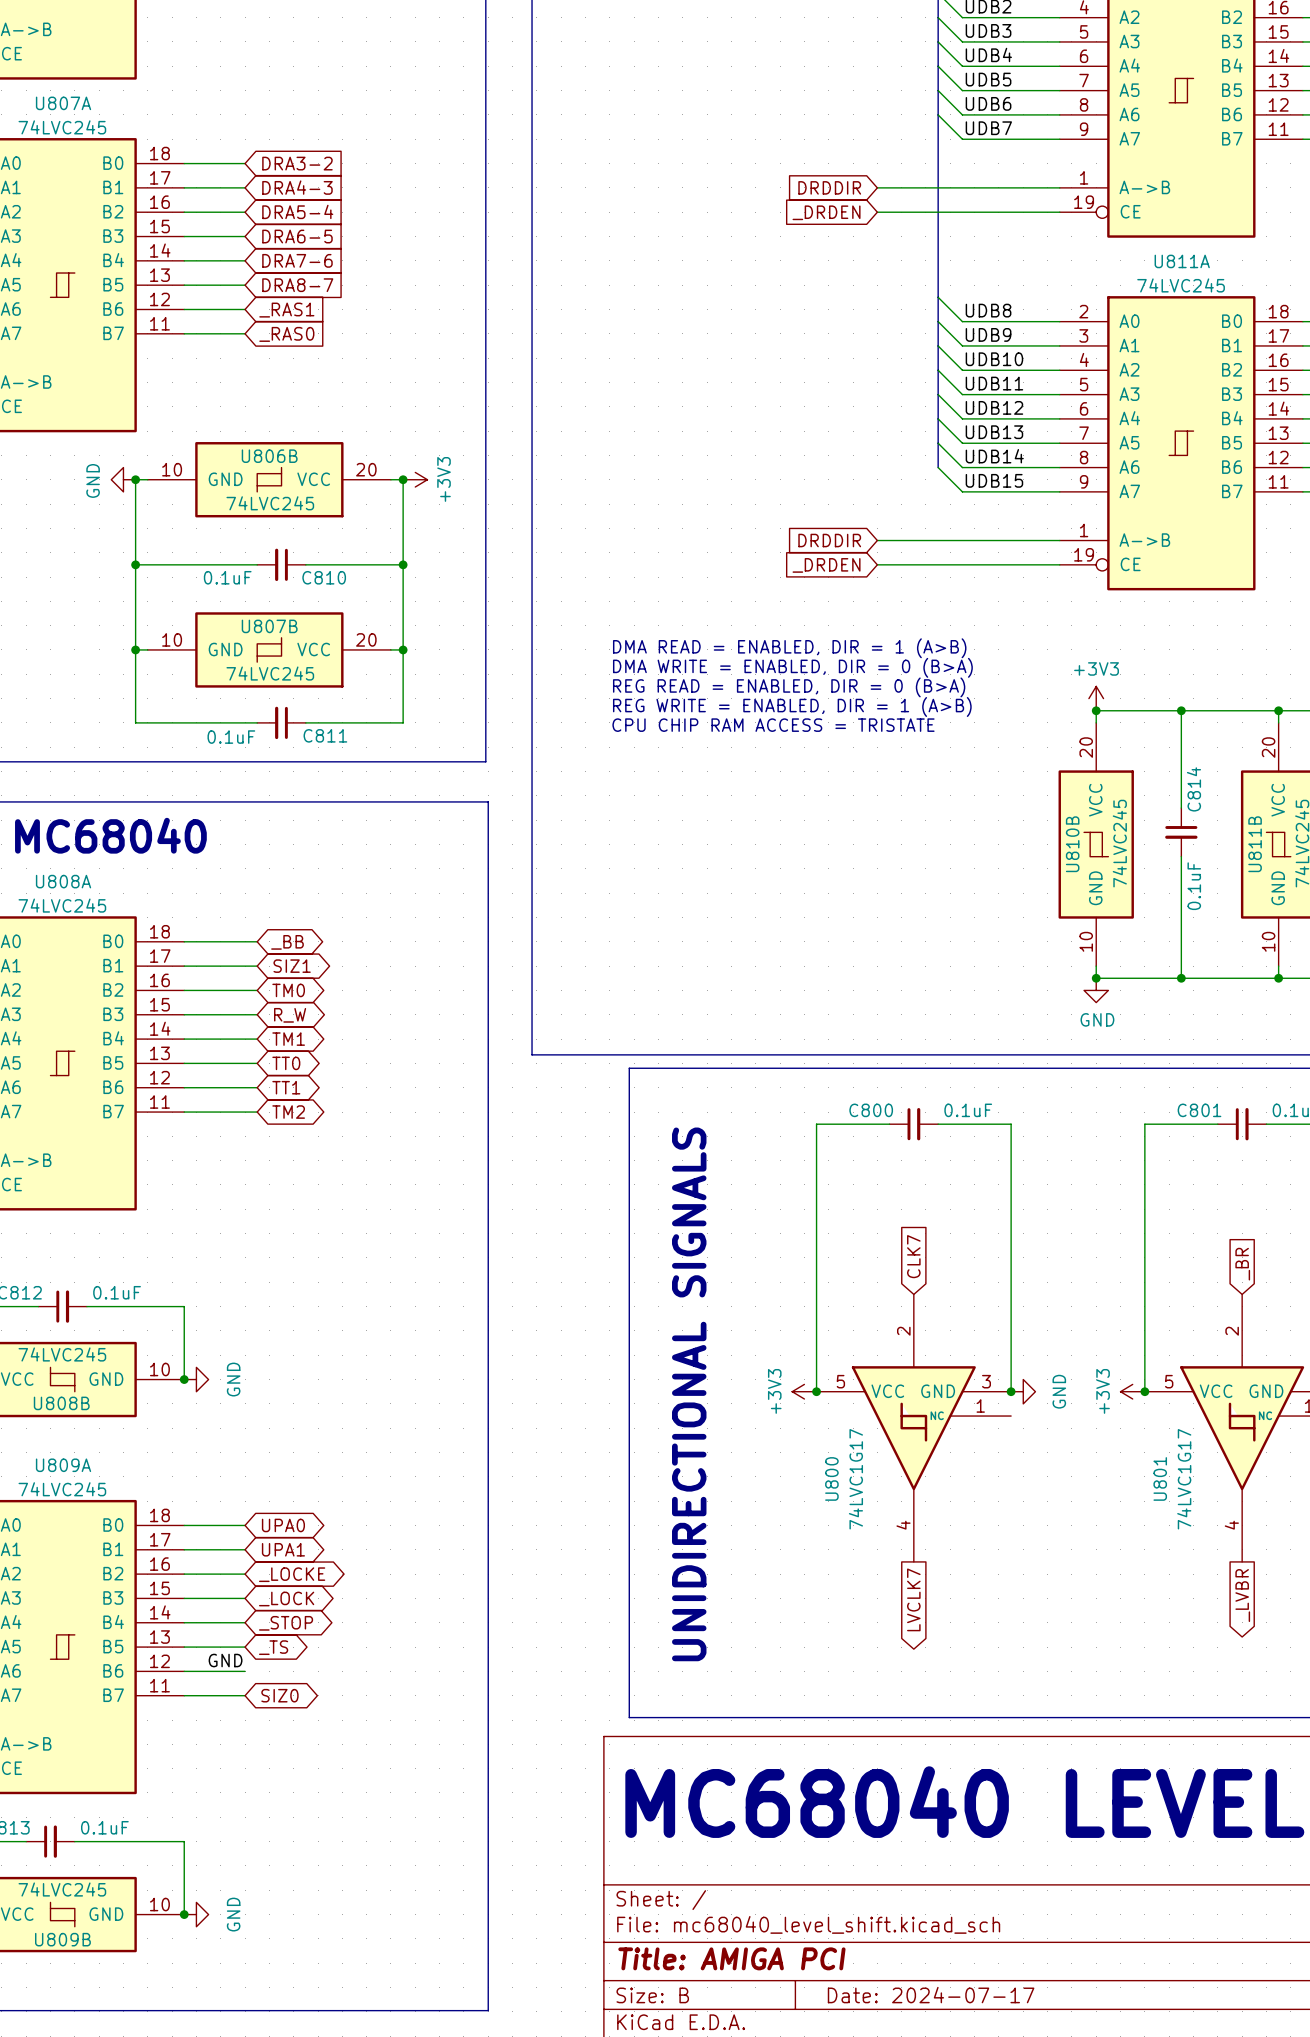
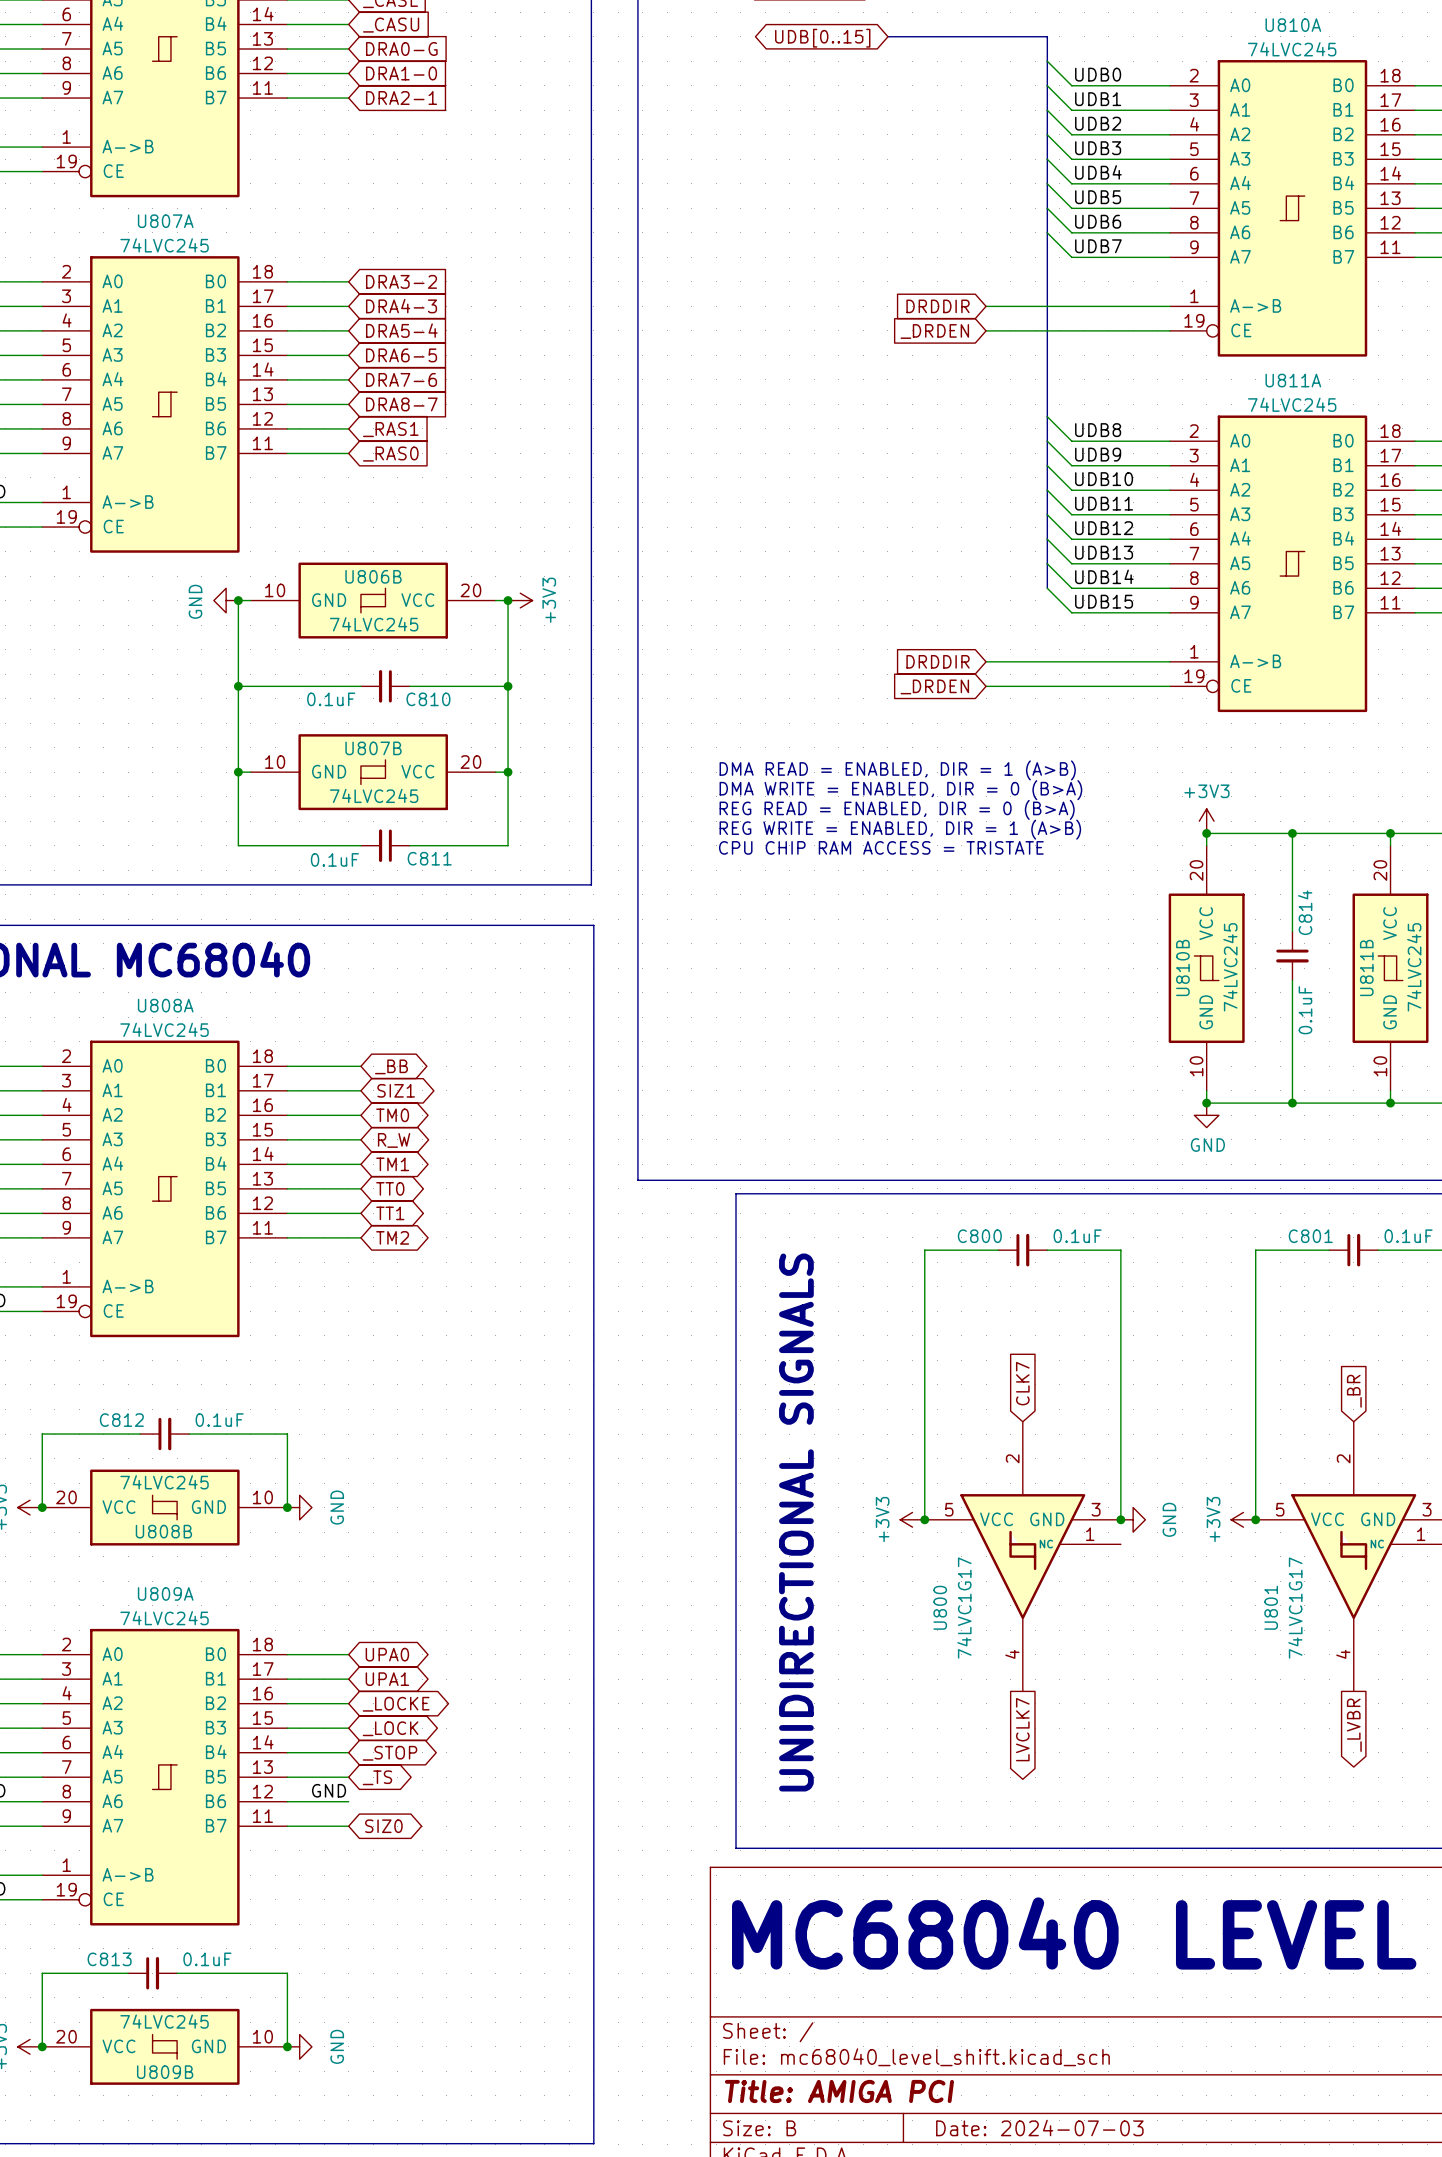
title block: Date: 2024-07-17 (931, 1995) -> Date: 2024-07-03 (1039, 2128)

